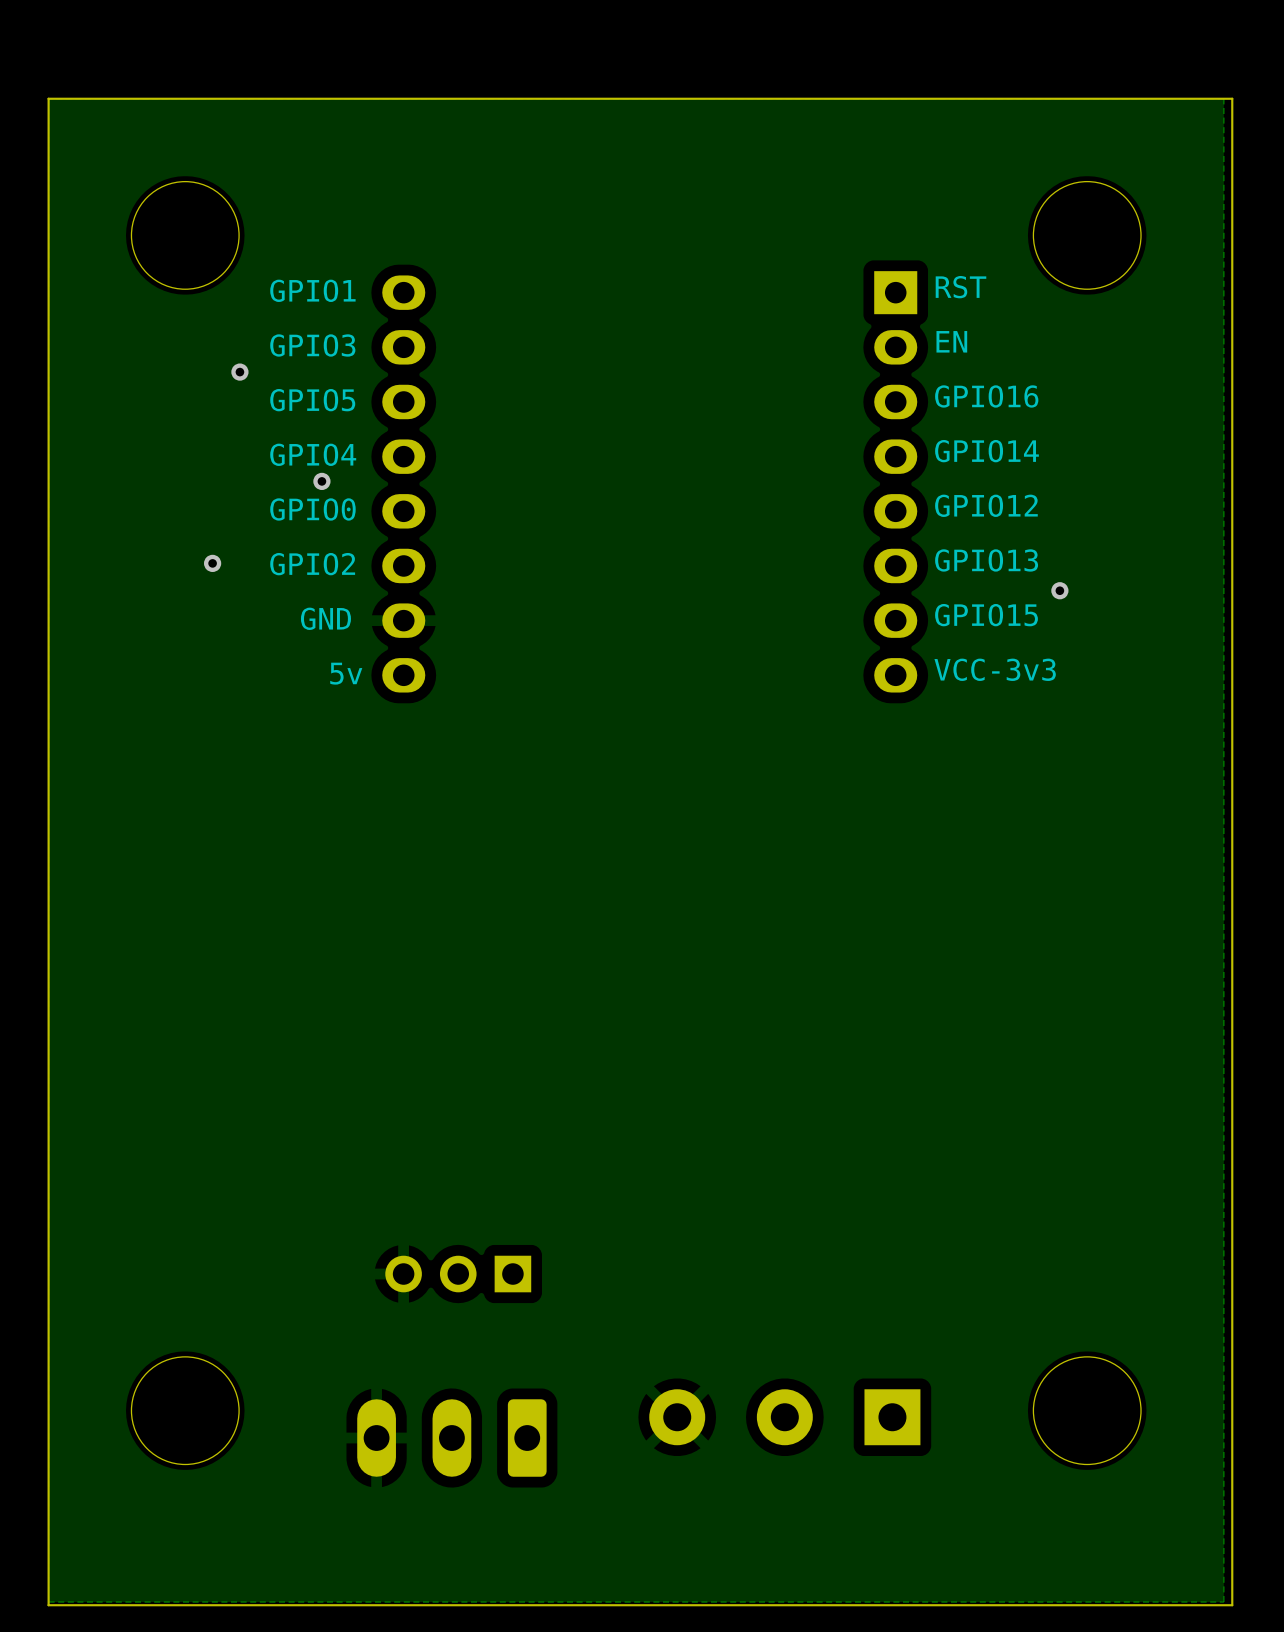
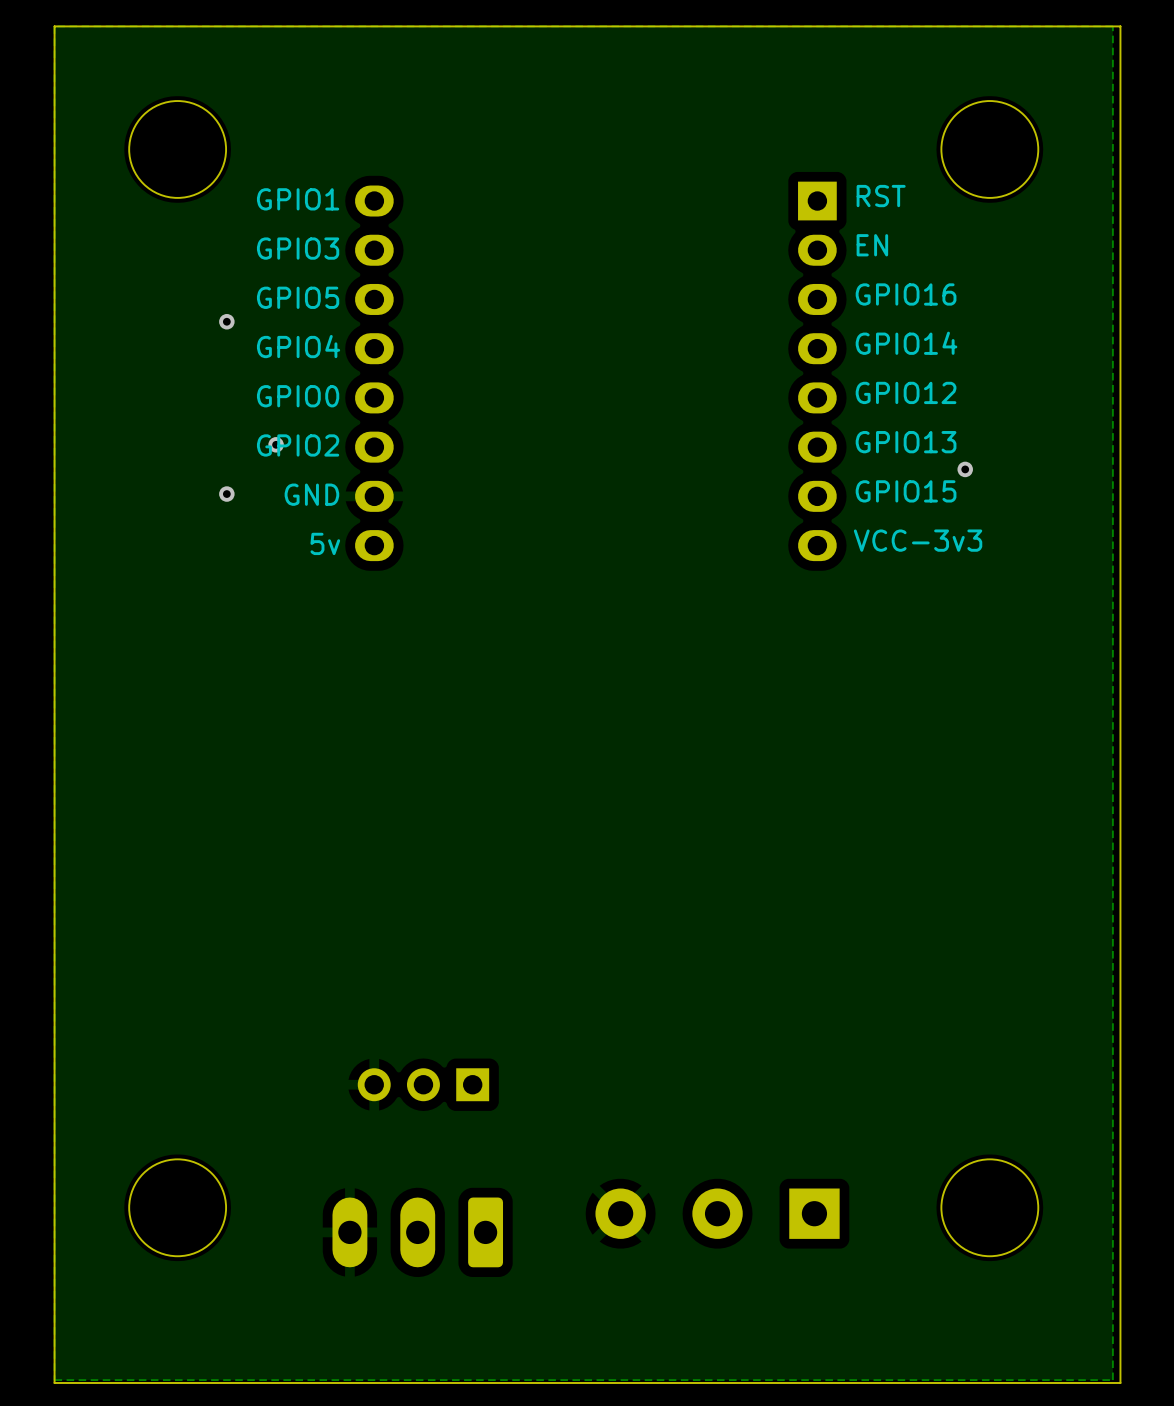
via: (239, 372) -> none
via: none -> (226, 321)
via: (321, 481) -> none
via: (212, 563) -> none
via: none -> (276, 444)
via: none -> (226, 494)

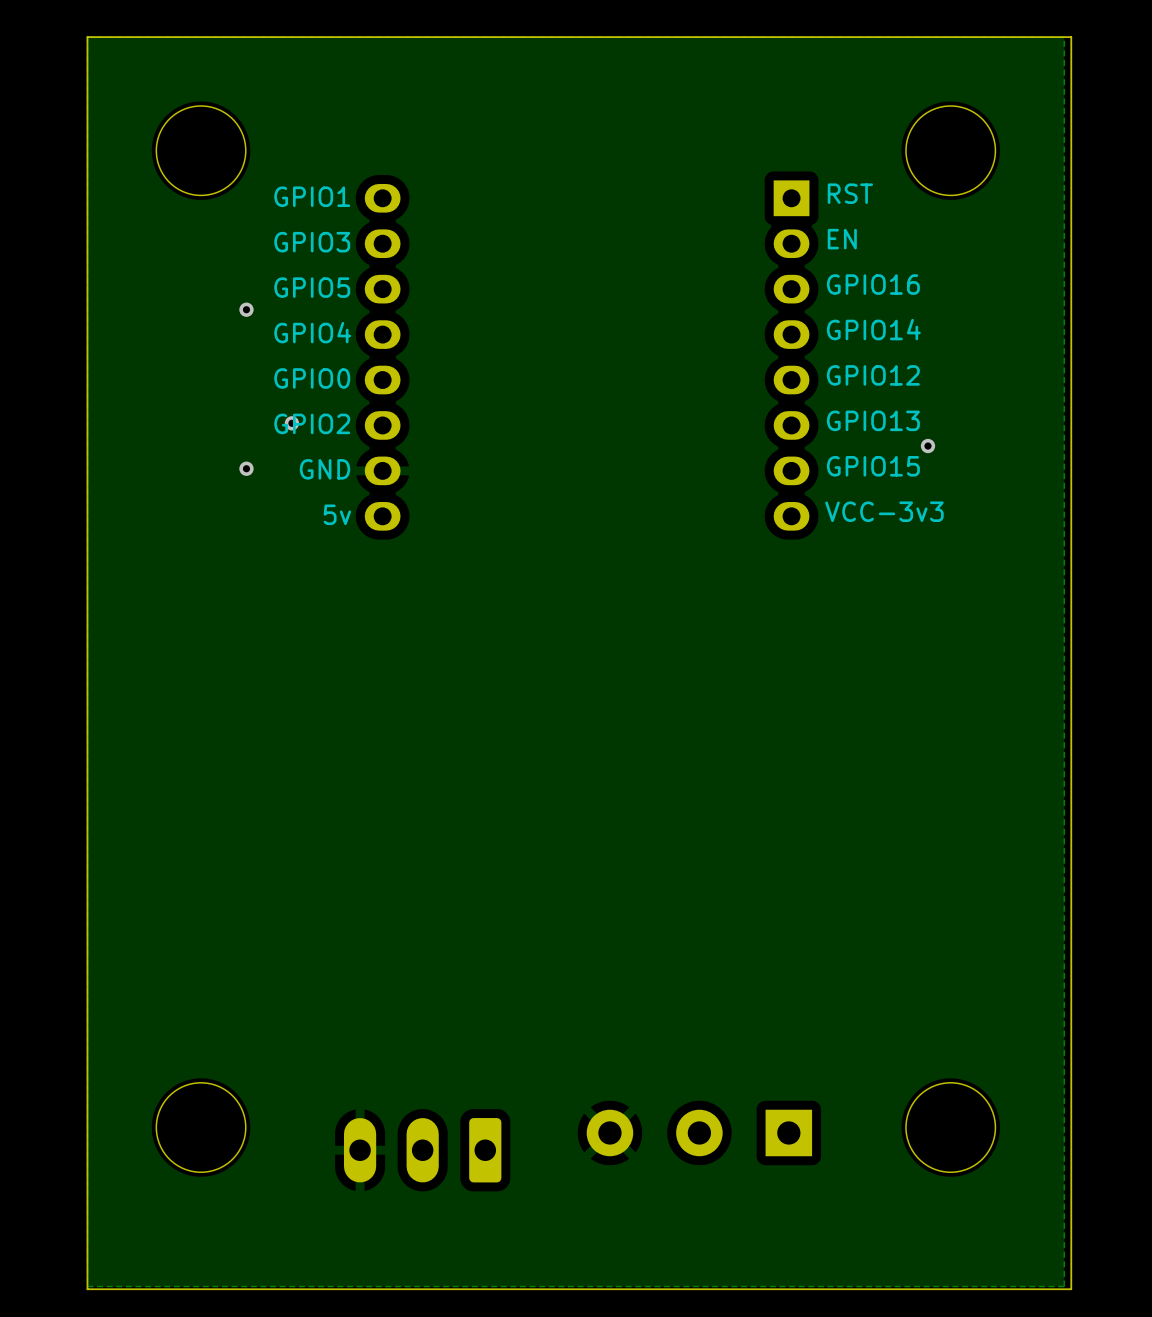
part: (423, 1084) -> none

